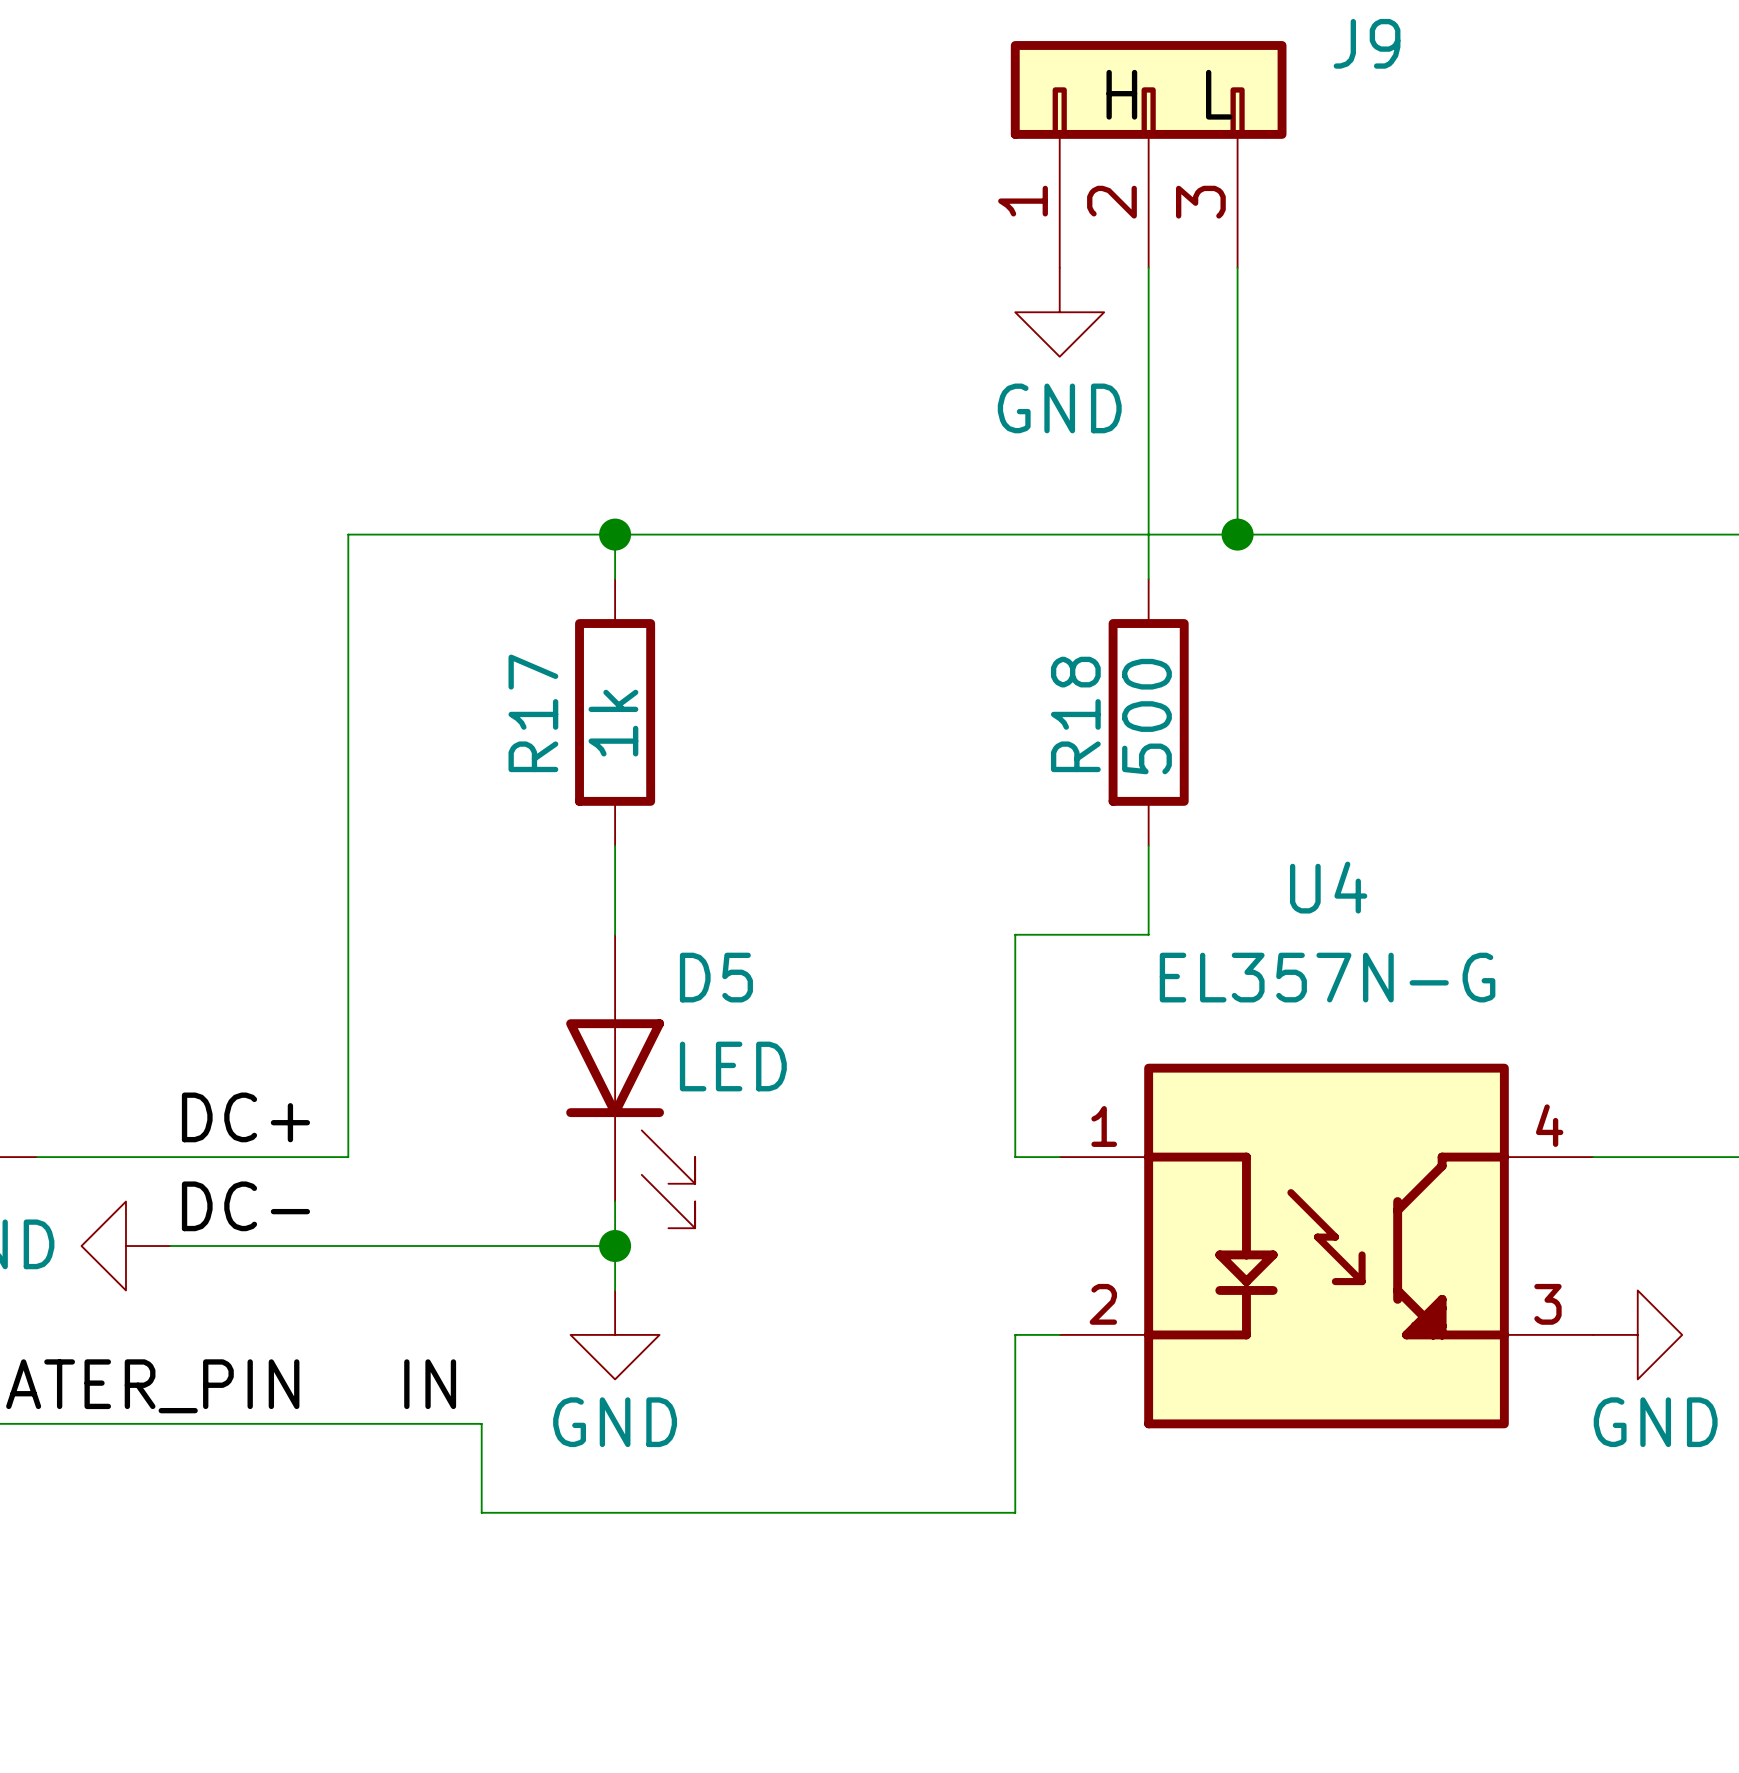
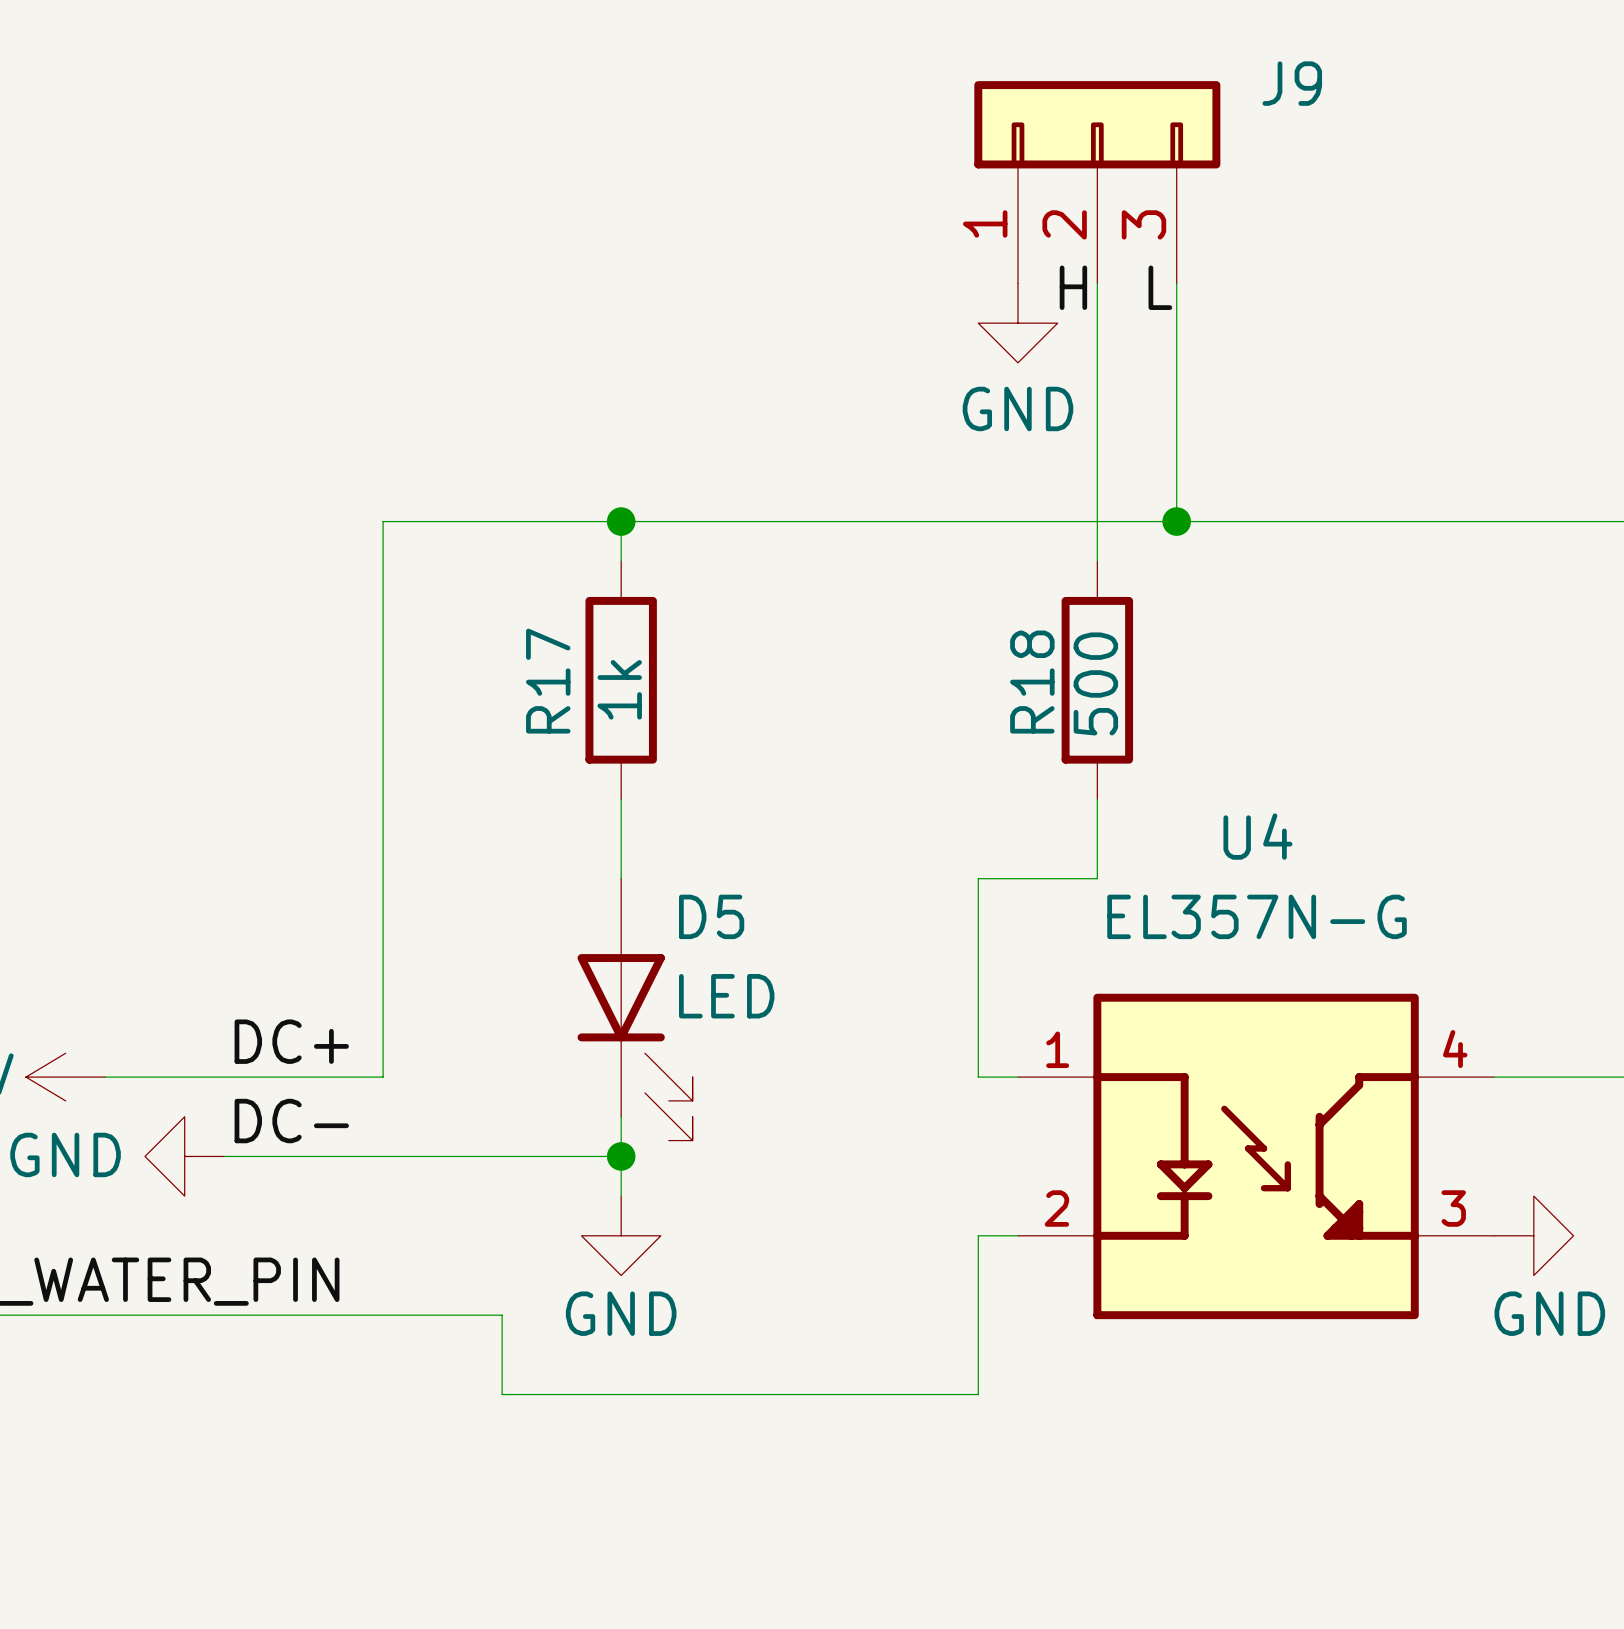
label position: H (1121, 94) -> H (1073, 287)
label position: L (1219, 94) -> L (1160, 287)
label: IN (430, 1384) -> none

